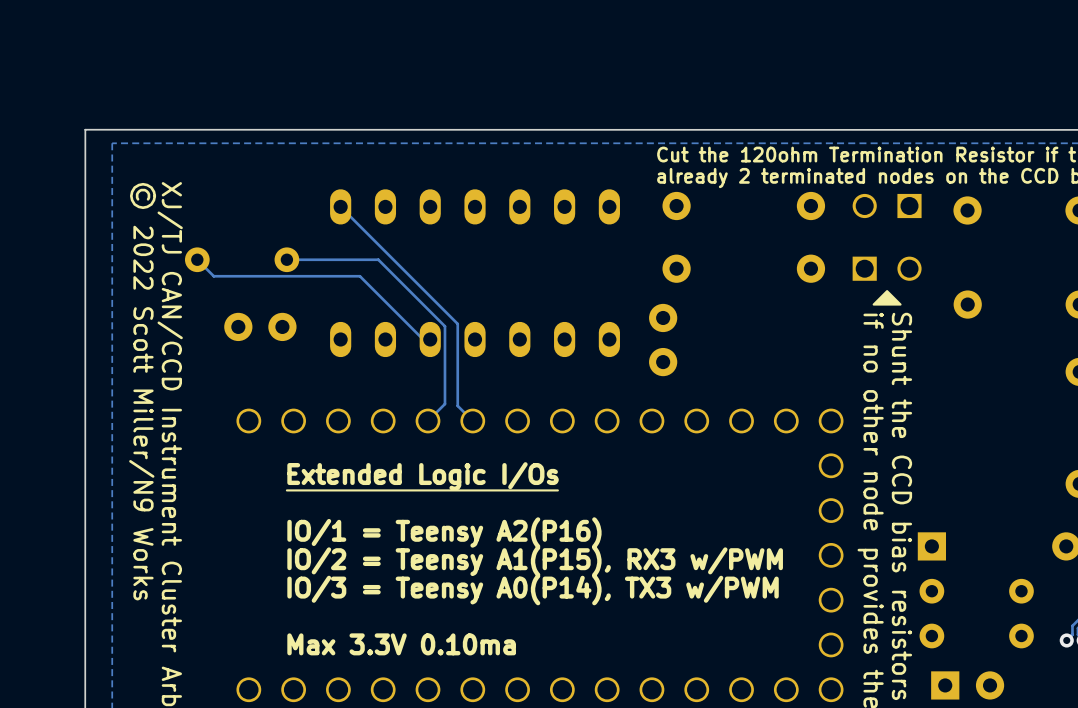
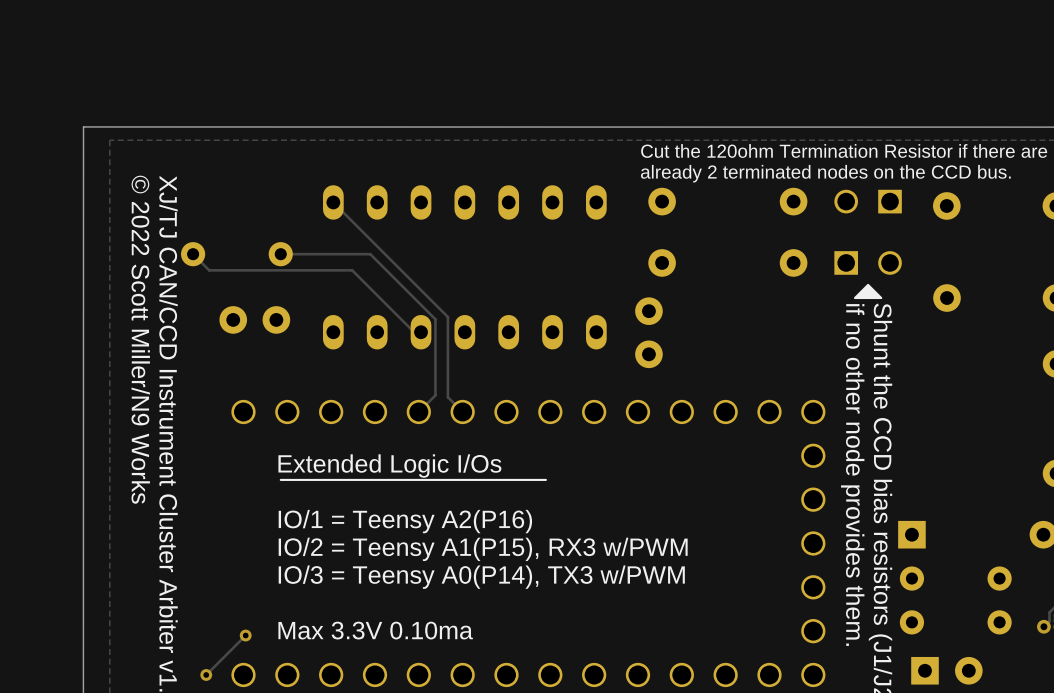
track: none -> (245, 635) (206, 674)
via: none -> (245, 635)
via: none -> (206, 674)

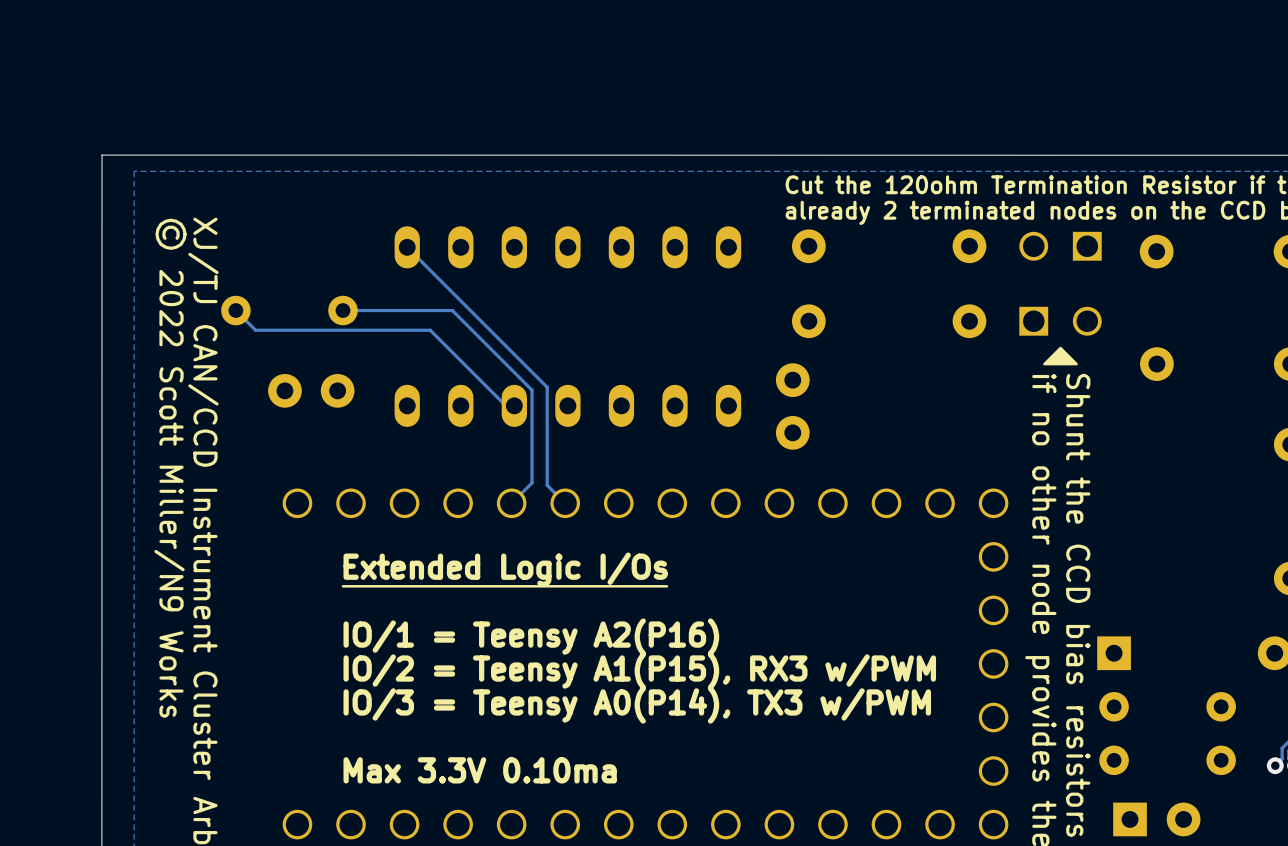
track: (245, 635) (206, 674) -> none
via: (245, 635) -> none
via: (206, 674) -> none

